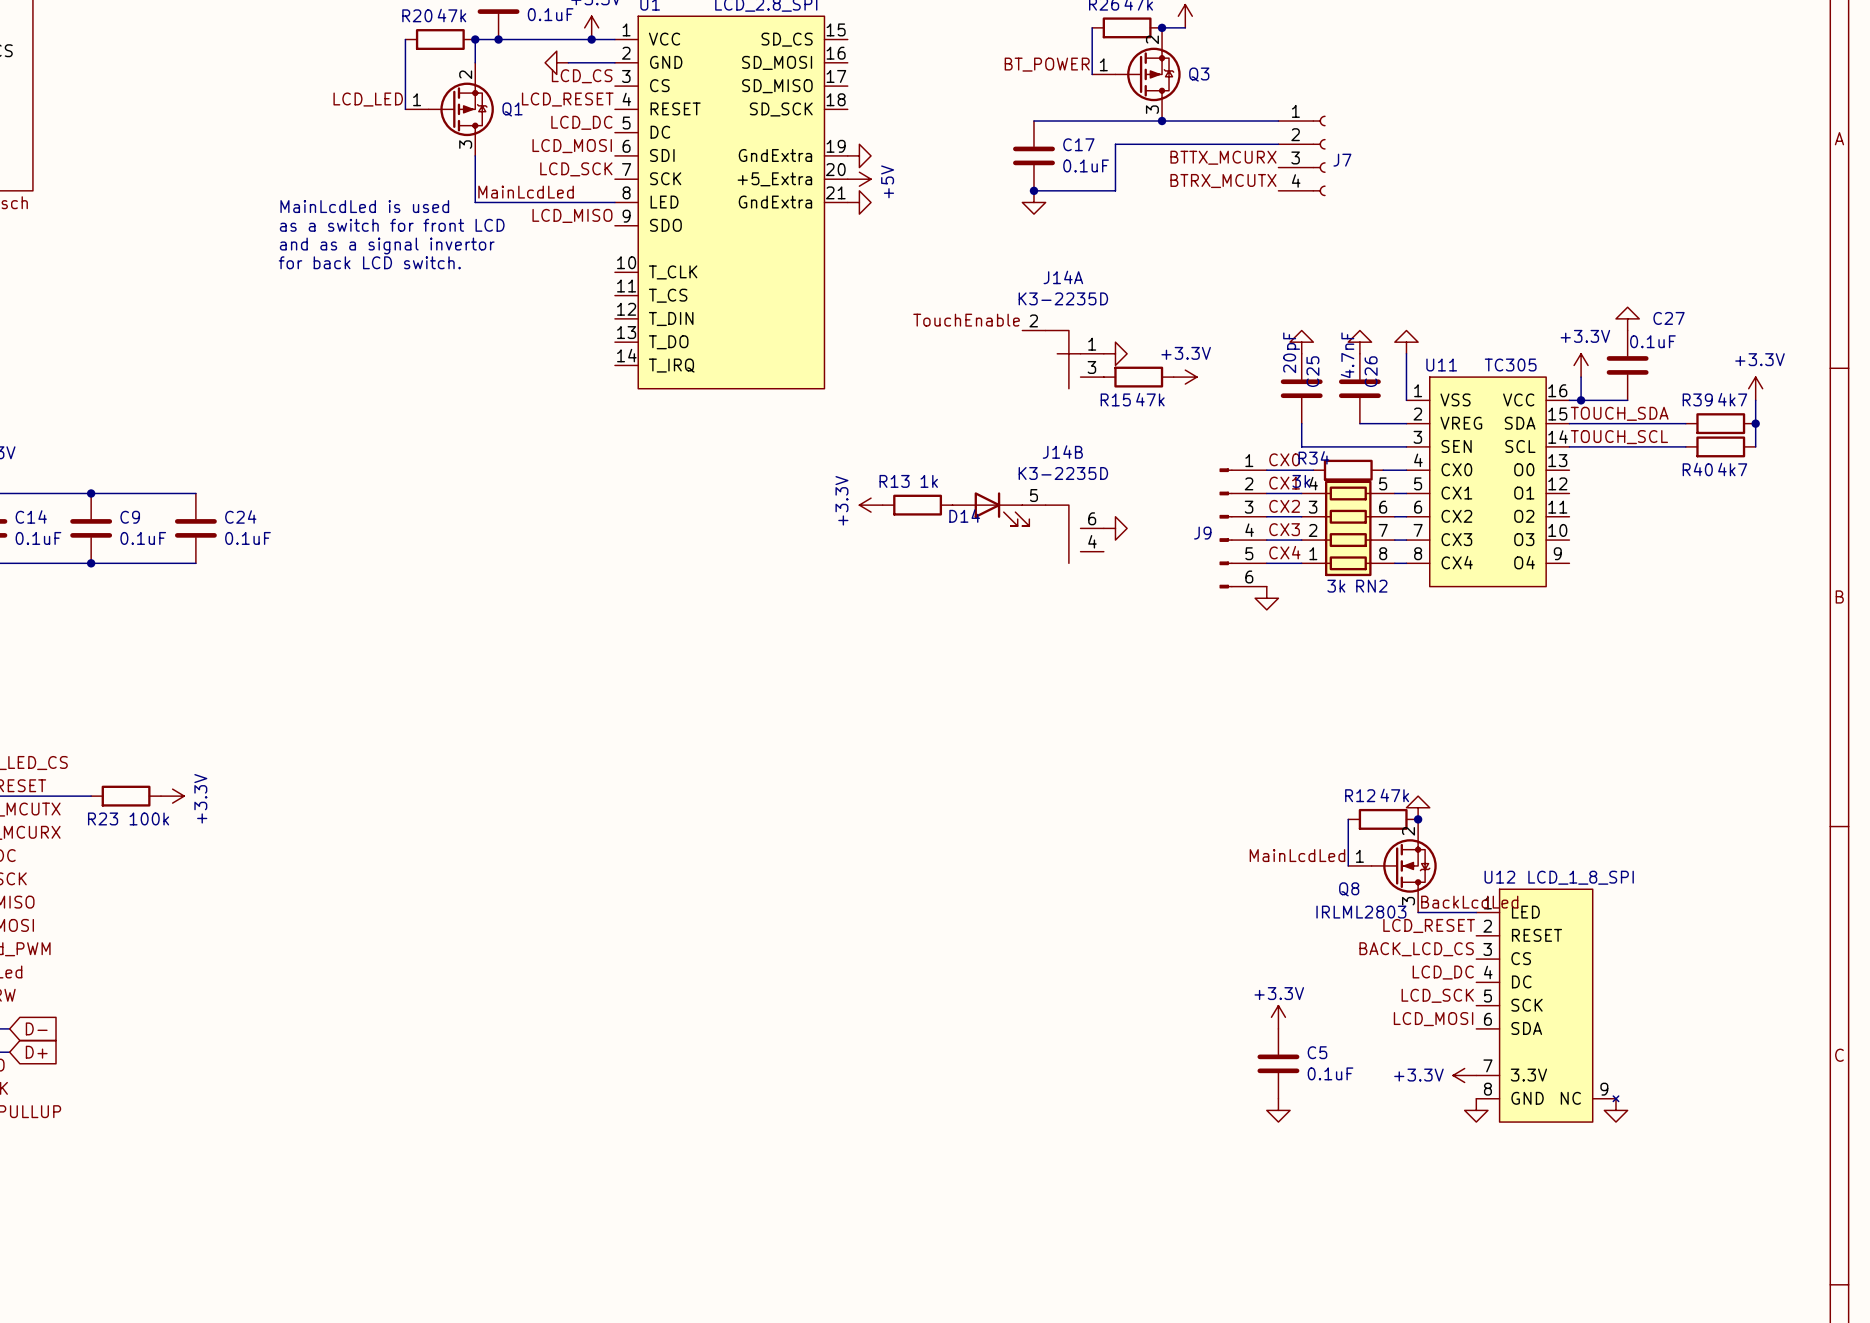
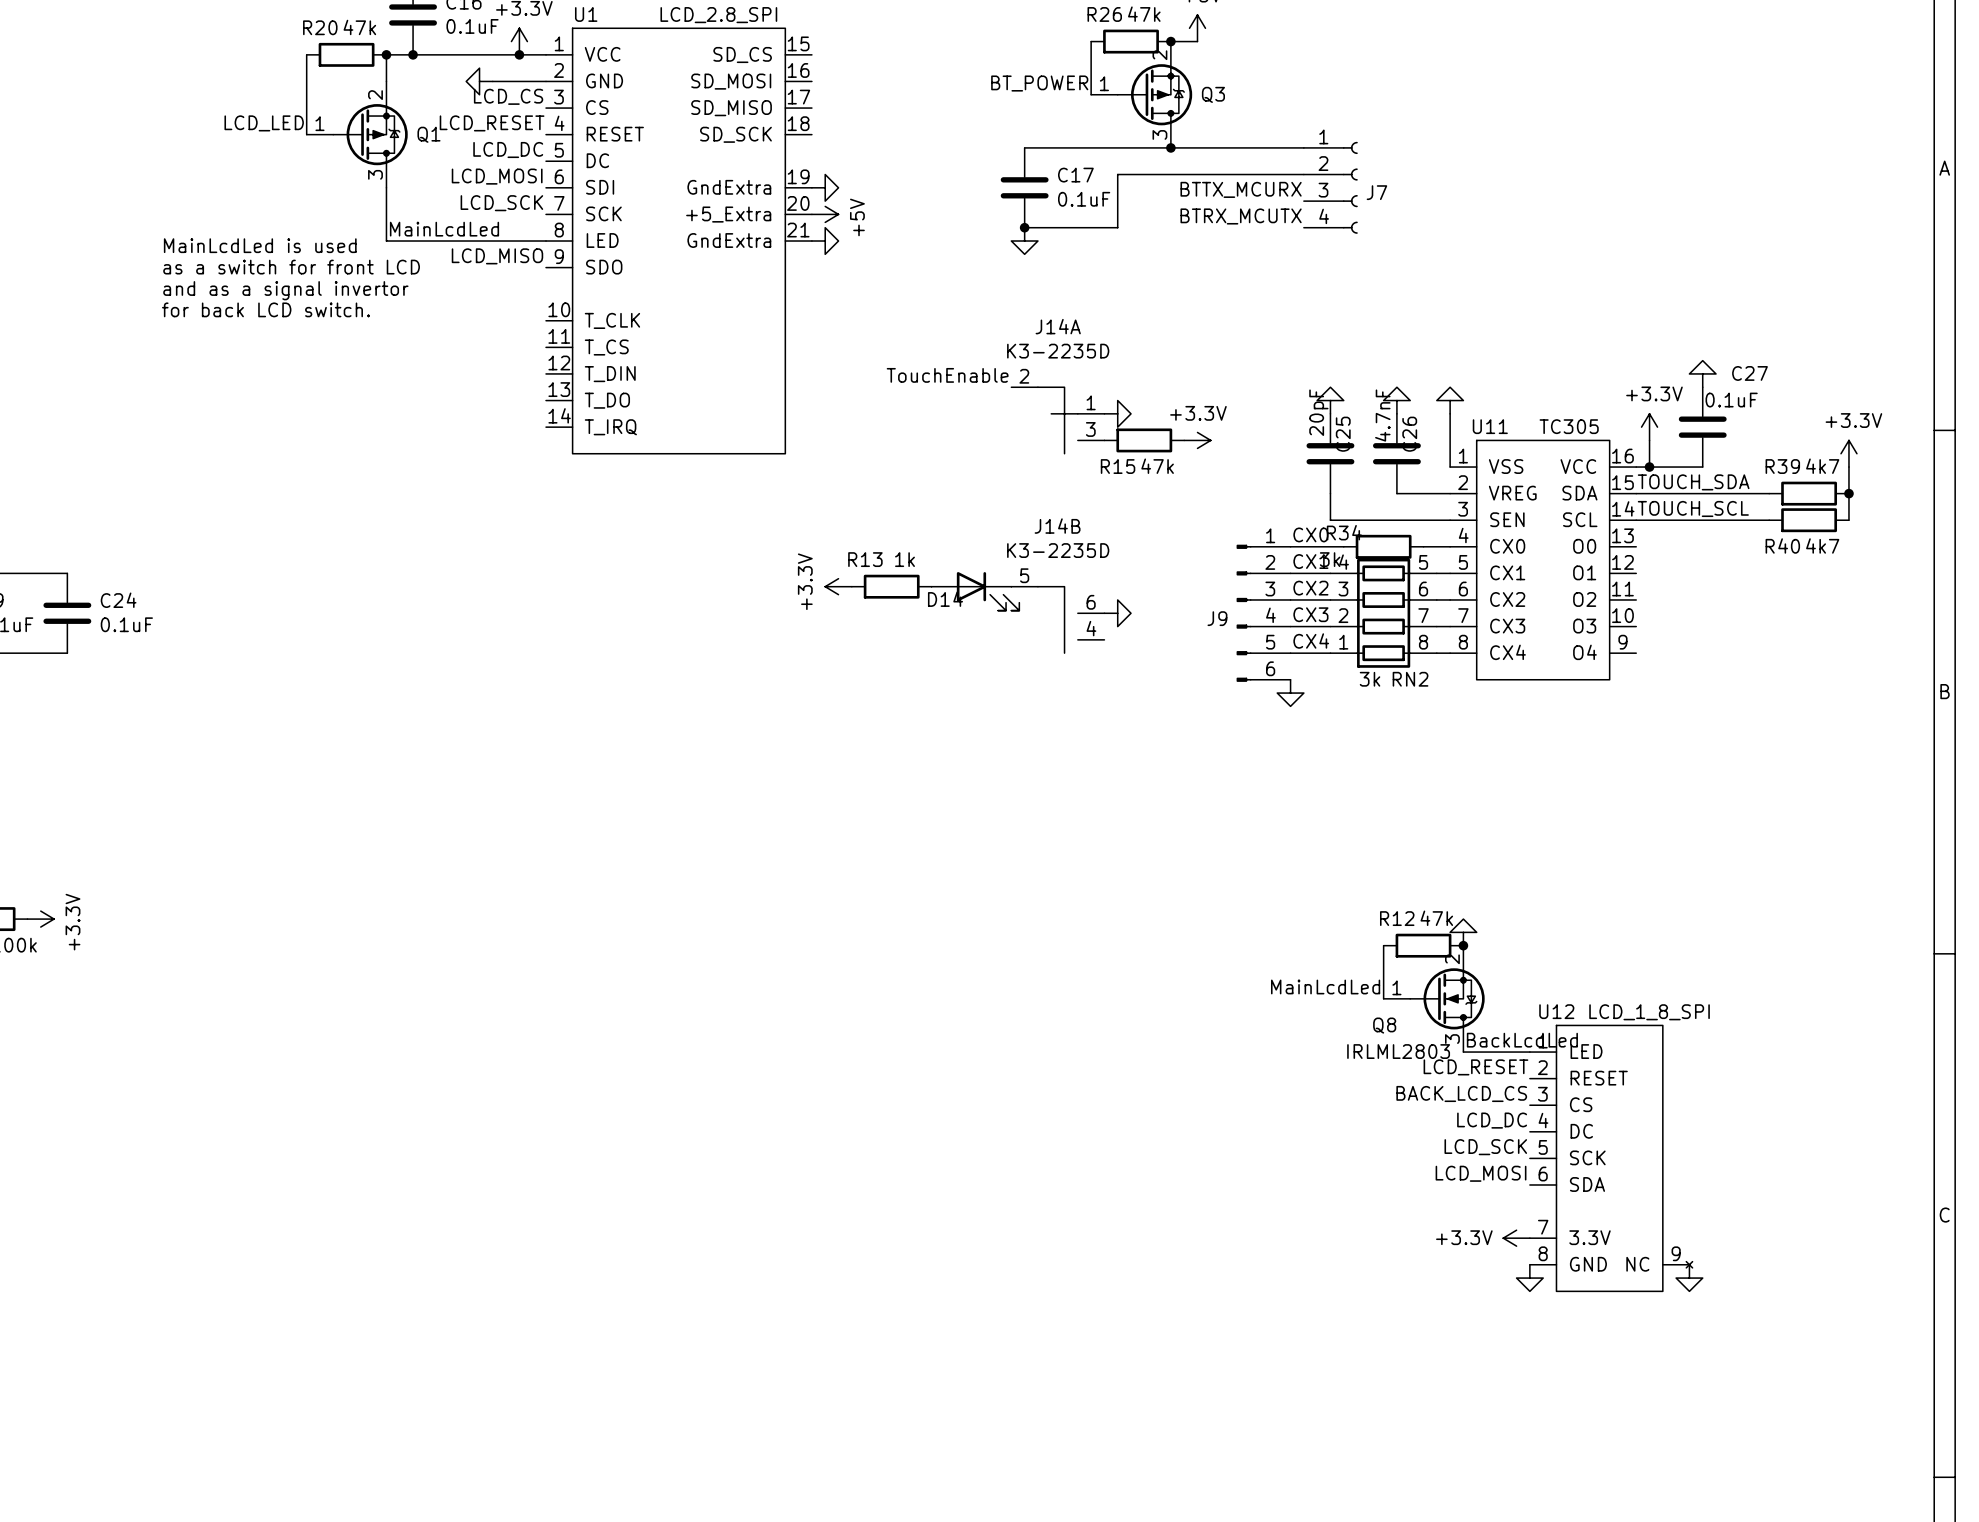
power symbol: +3.3V (1278, 1017) -> none
C5: 0.1uF (1278, 1063) -> none
power symbol: (1278, 1110) -> none

